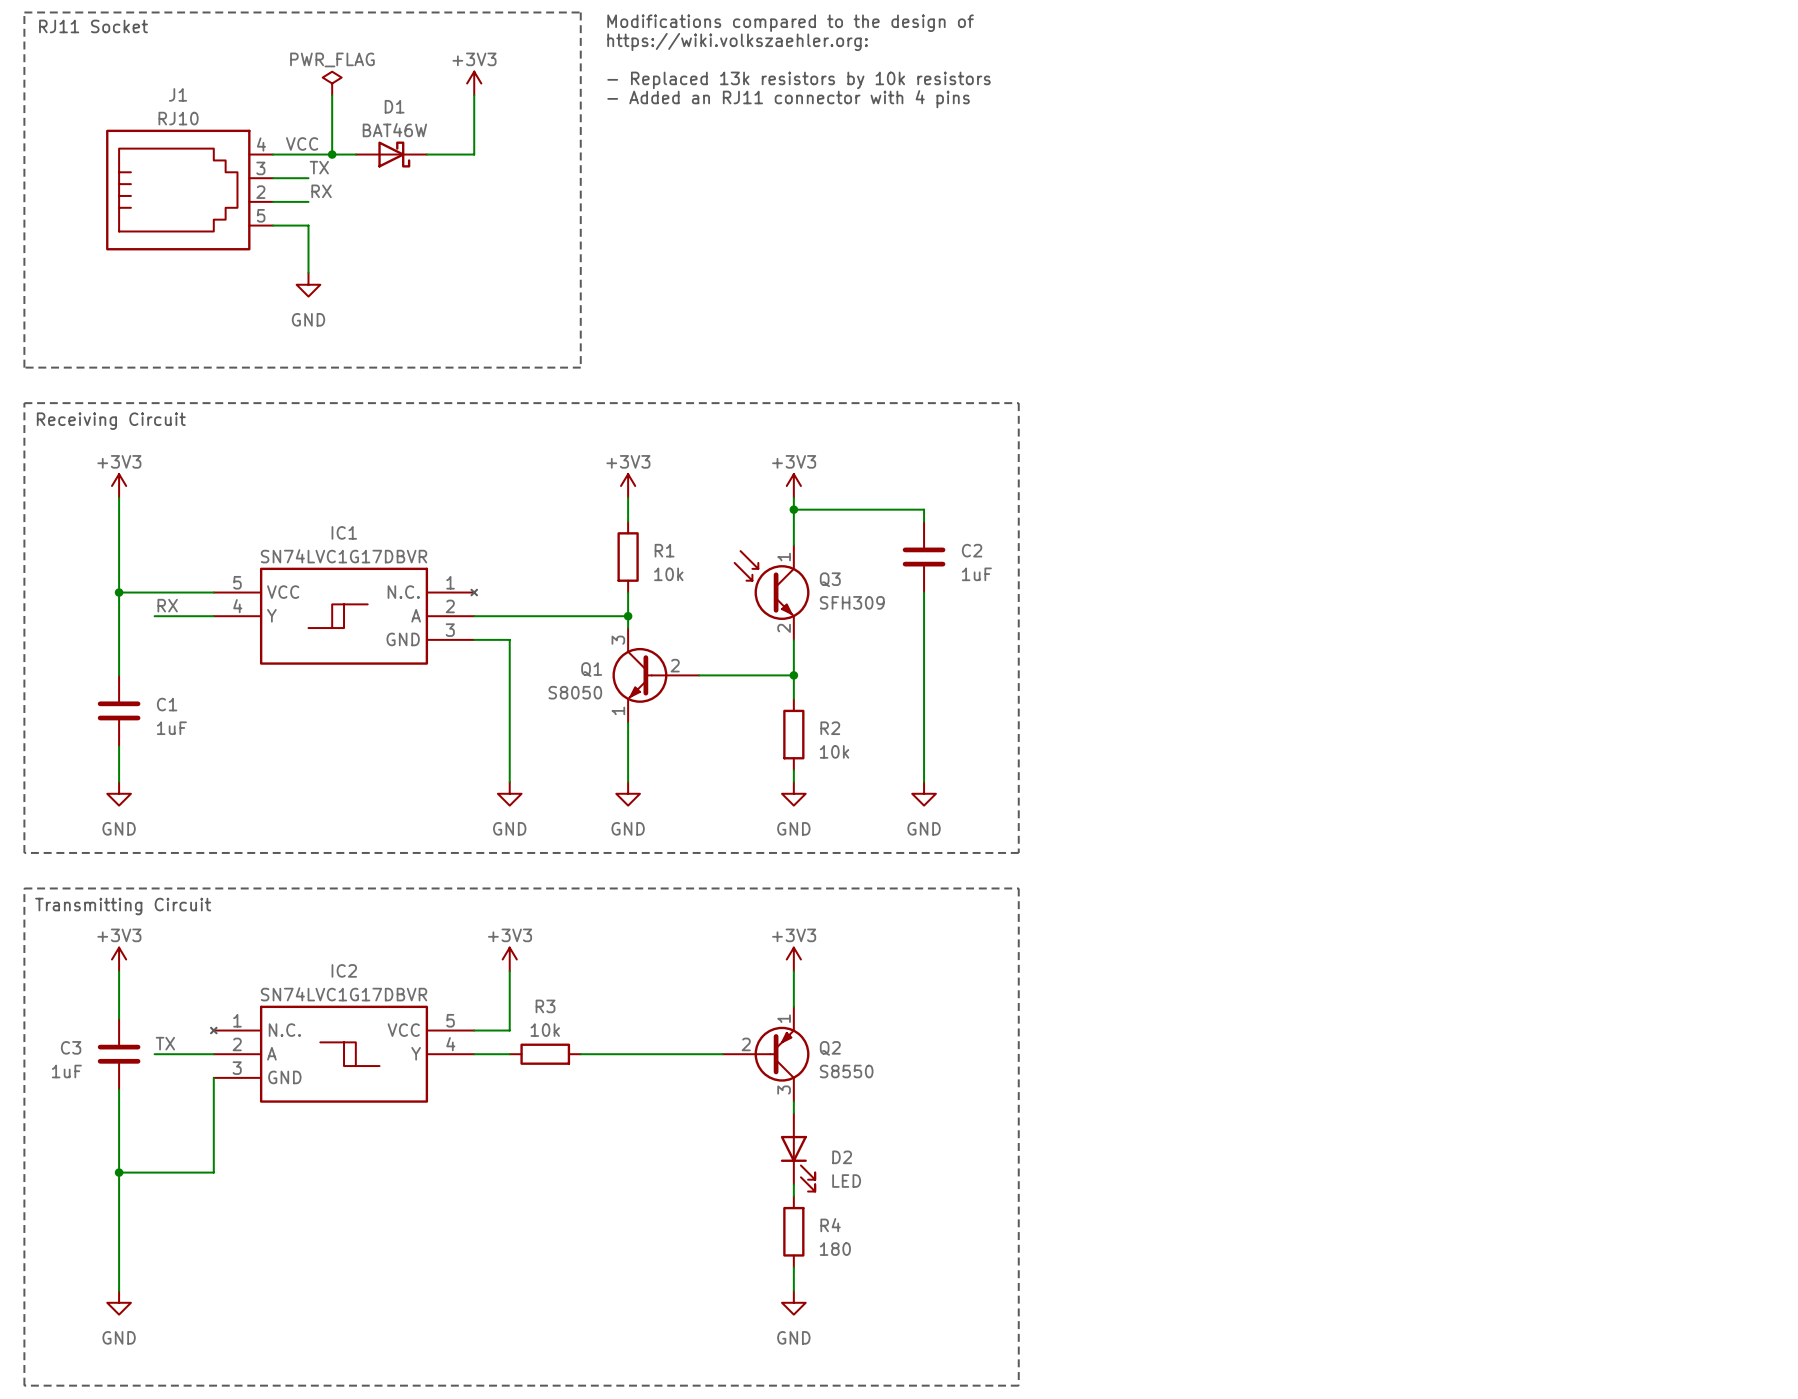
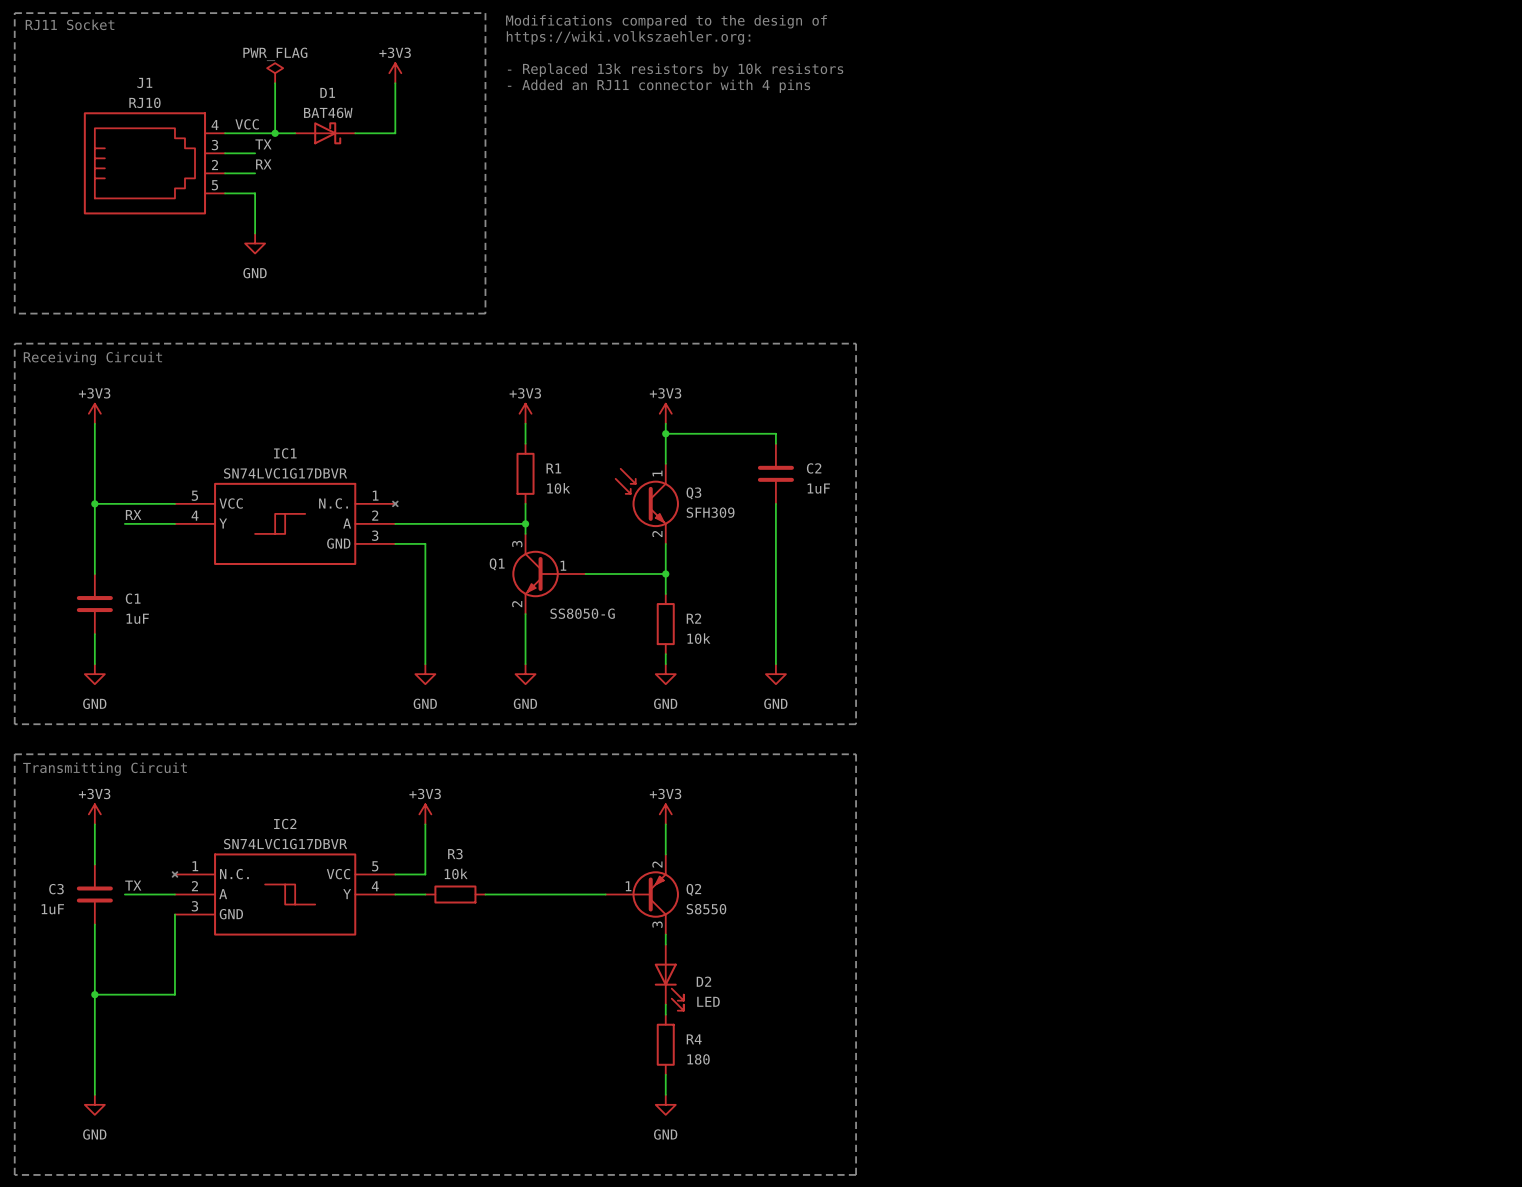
Q1 symbol: [612, 628, 700, 723] -> [512, 533, 586, 615]
Q1 value: S8050 (575, 692) -> SS8050-G (582, 613)
Q2 symbol: [722, 1006, 810, 1102] -> [605, 854, 679, 935]

